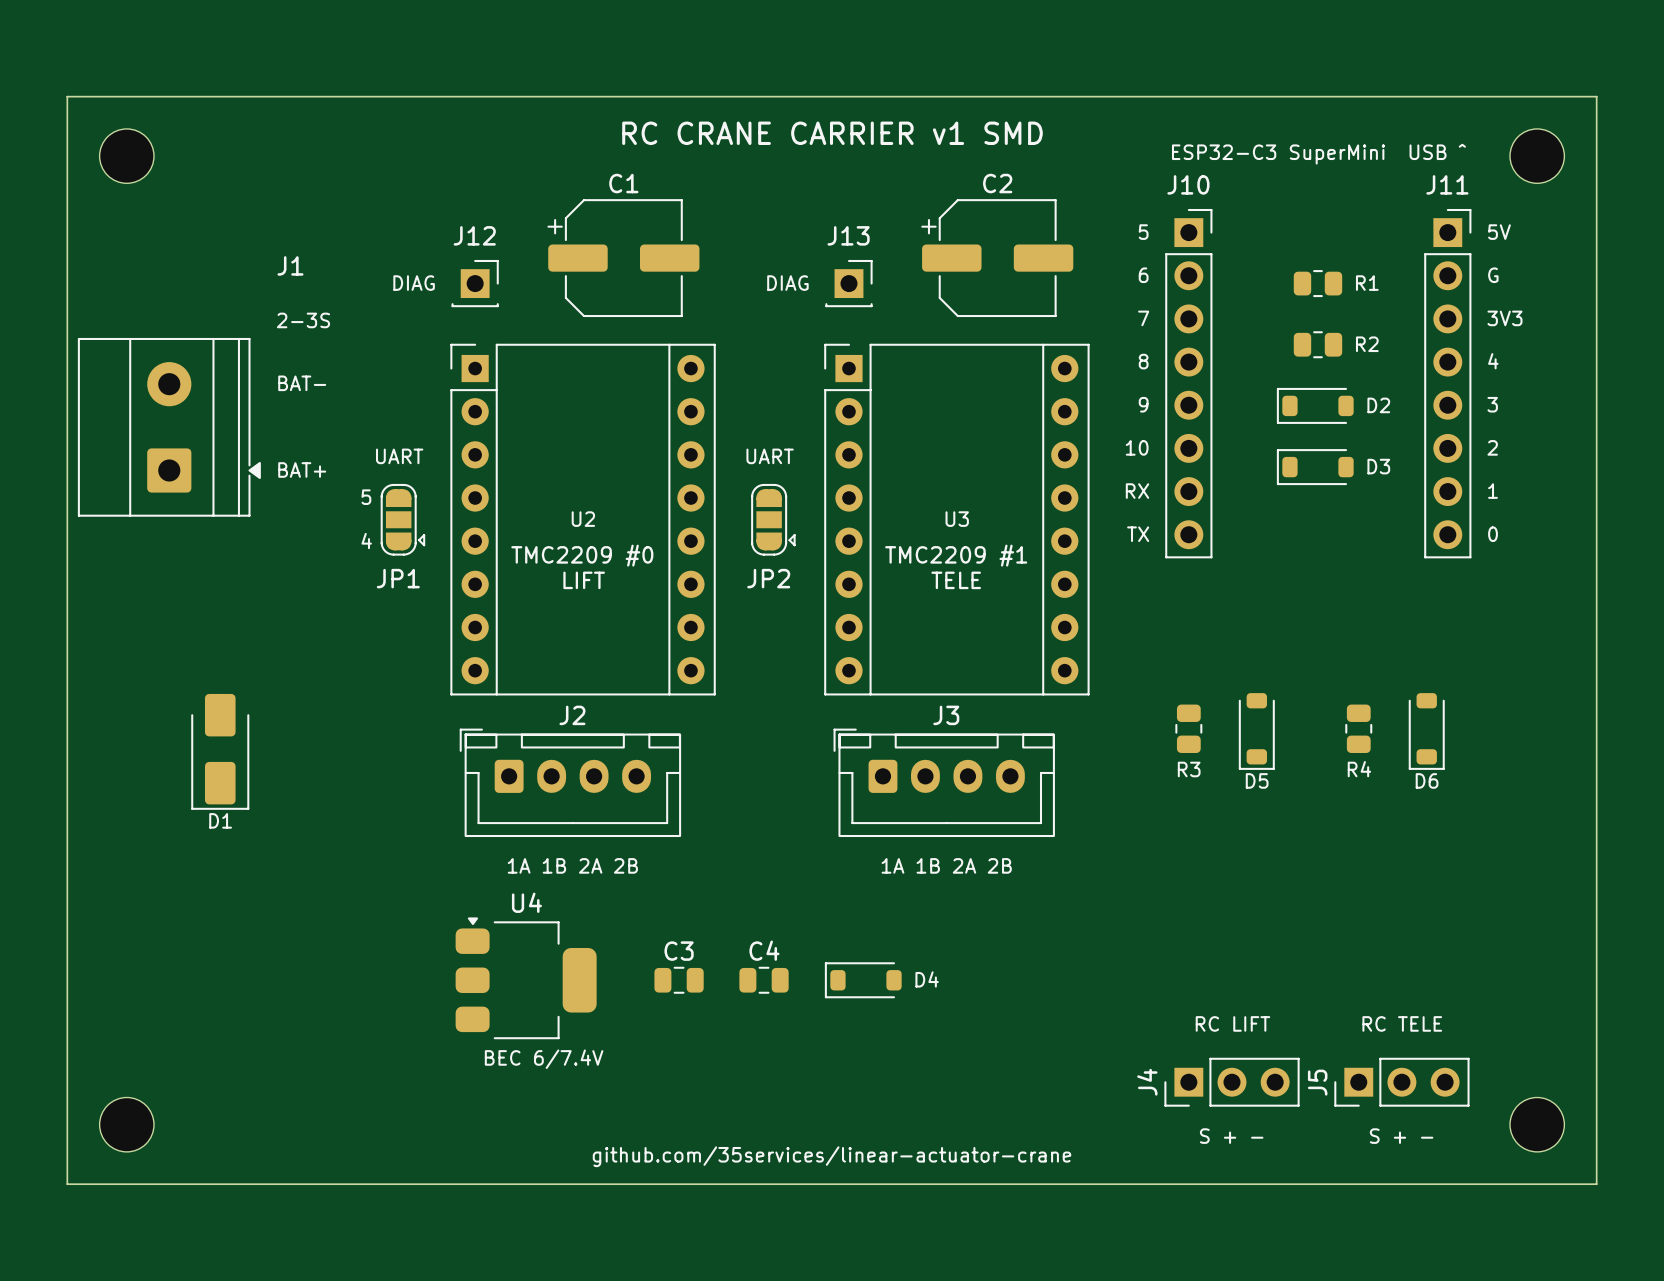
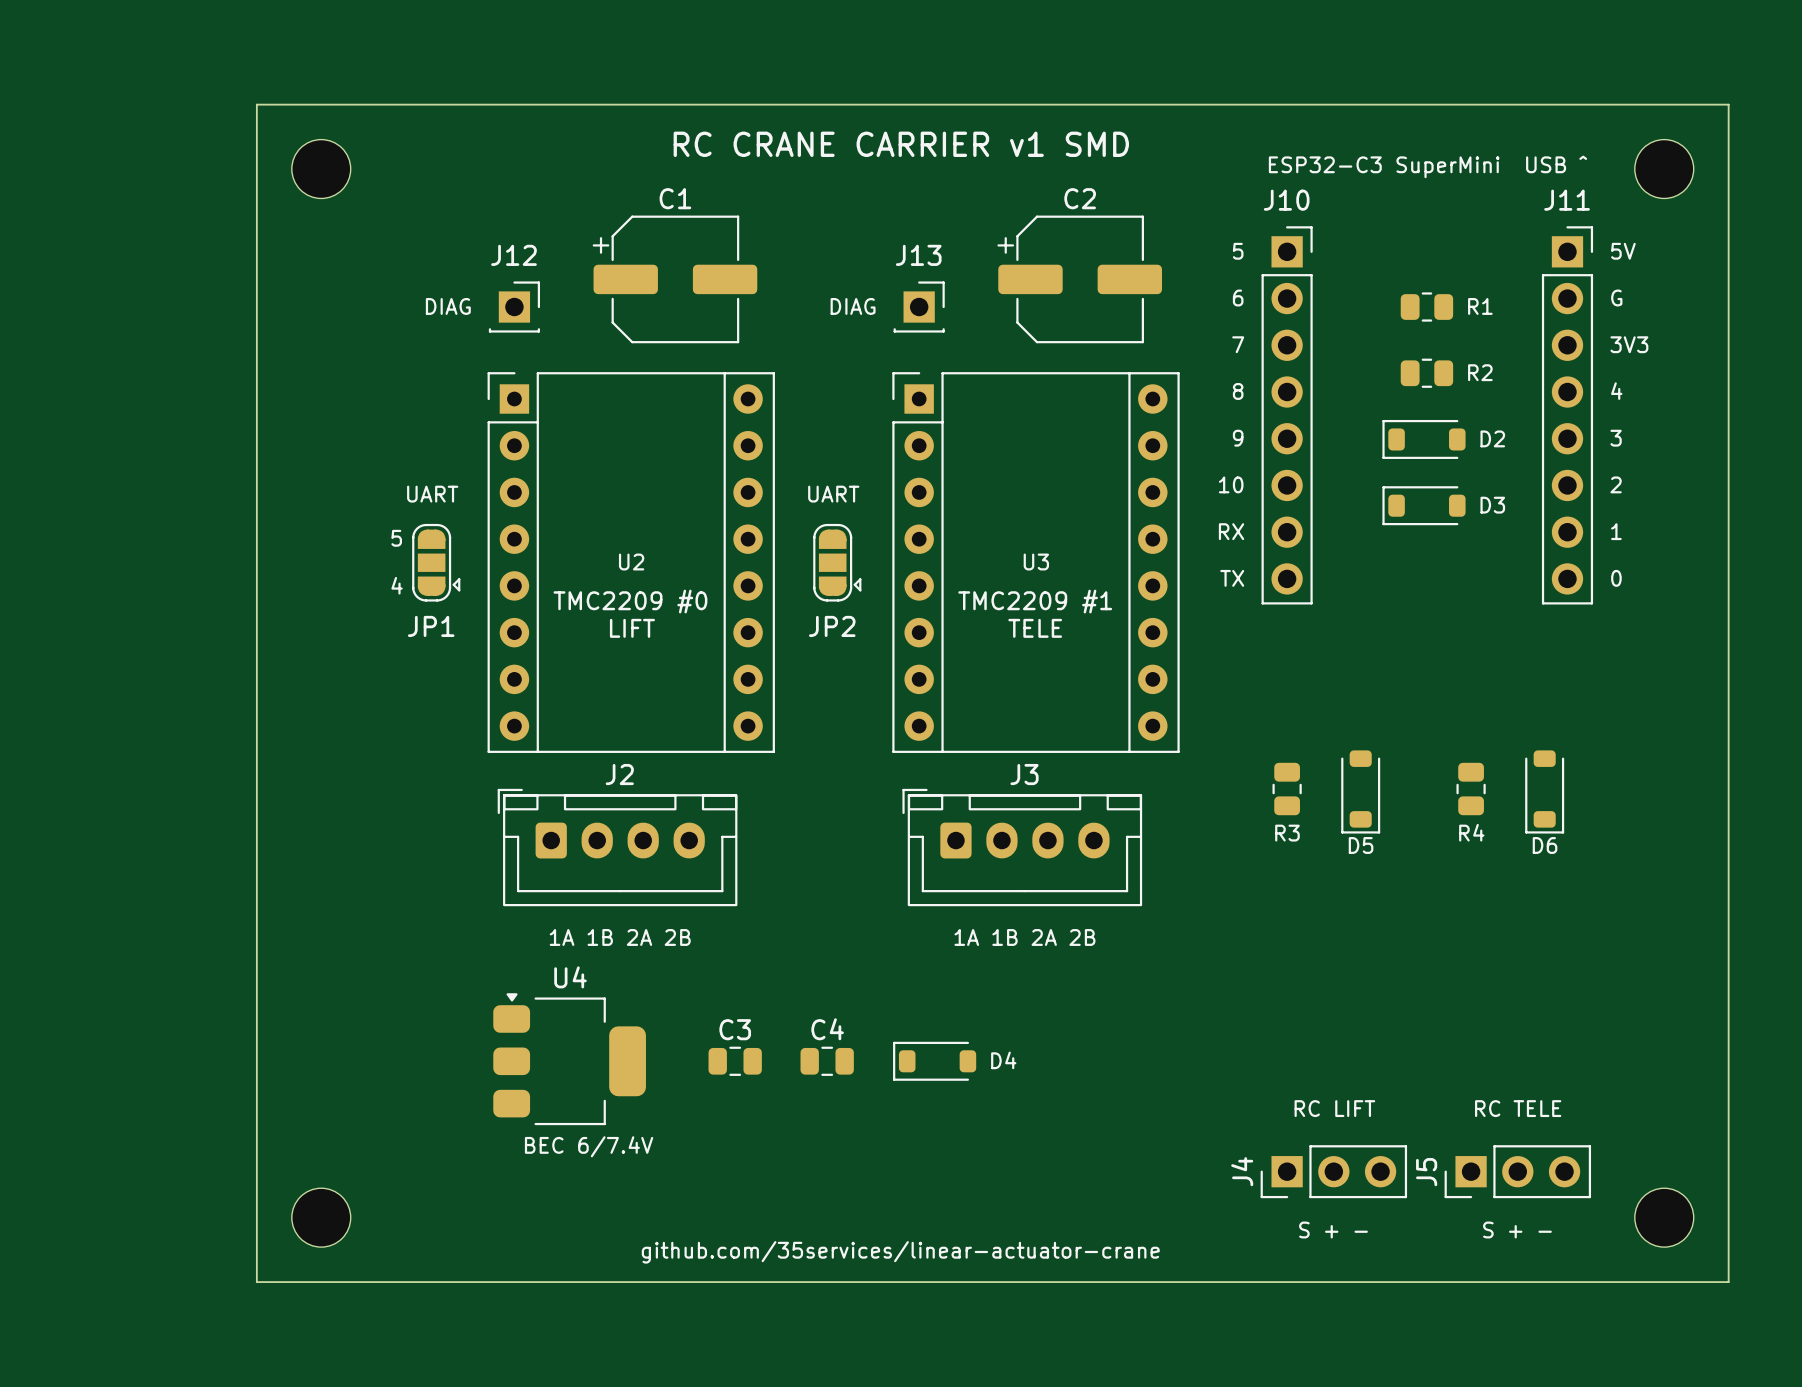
board edge: (237, 96) (67, 96) (67, 1184) (237, 1184) -> (256, 104) (256, 1282)
part position: (126, 156) -> (321, 169)
text: 2-3S (303, 320) -> none
text: BAT- (302, 383) -> none
J1: (169, 427) -> none
text: BAT+ (302, 469) -> none
D1: (220, 751) -> none
part position: (126, 1124) -> (321, 1217)

